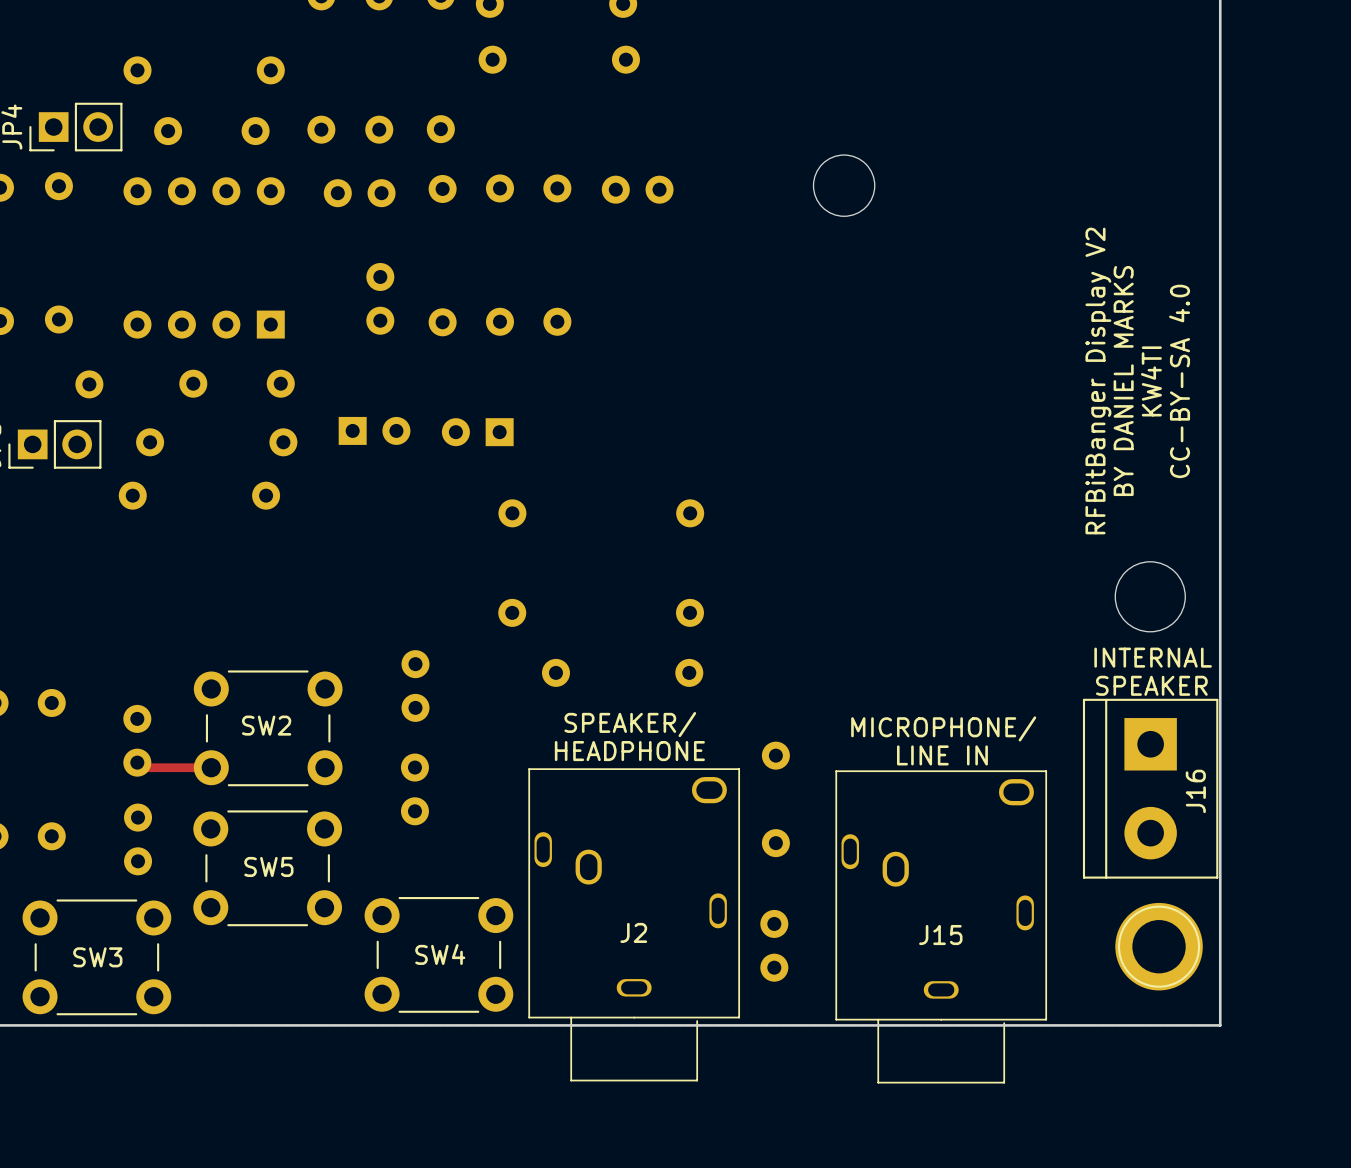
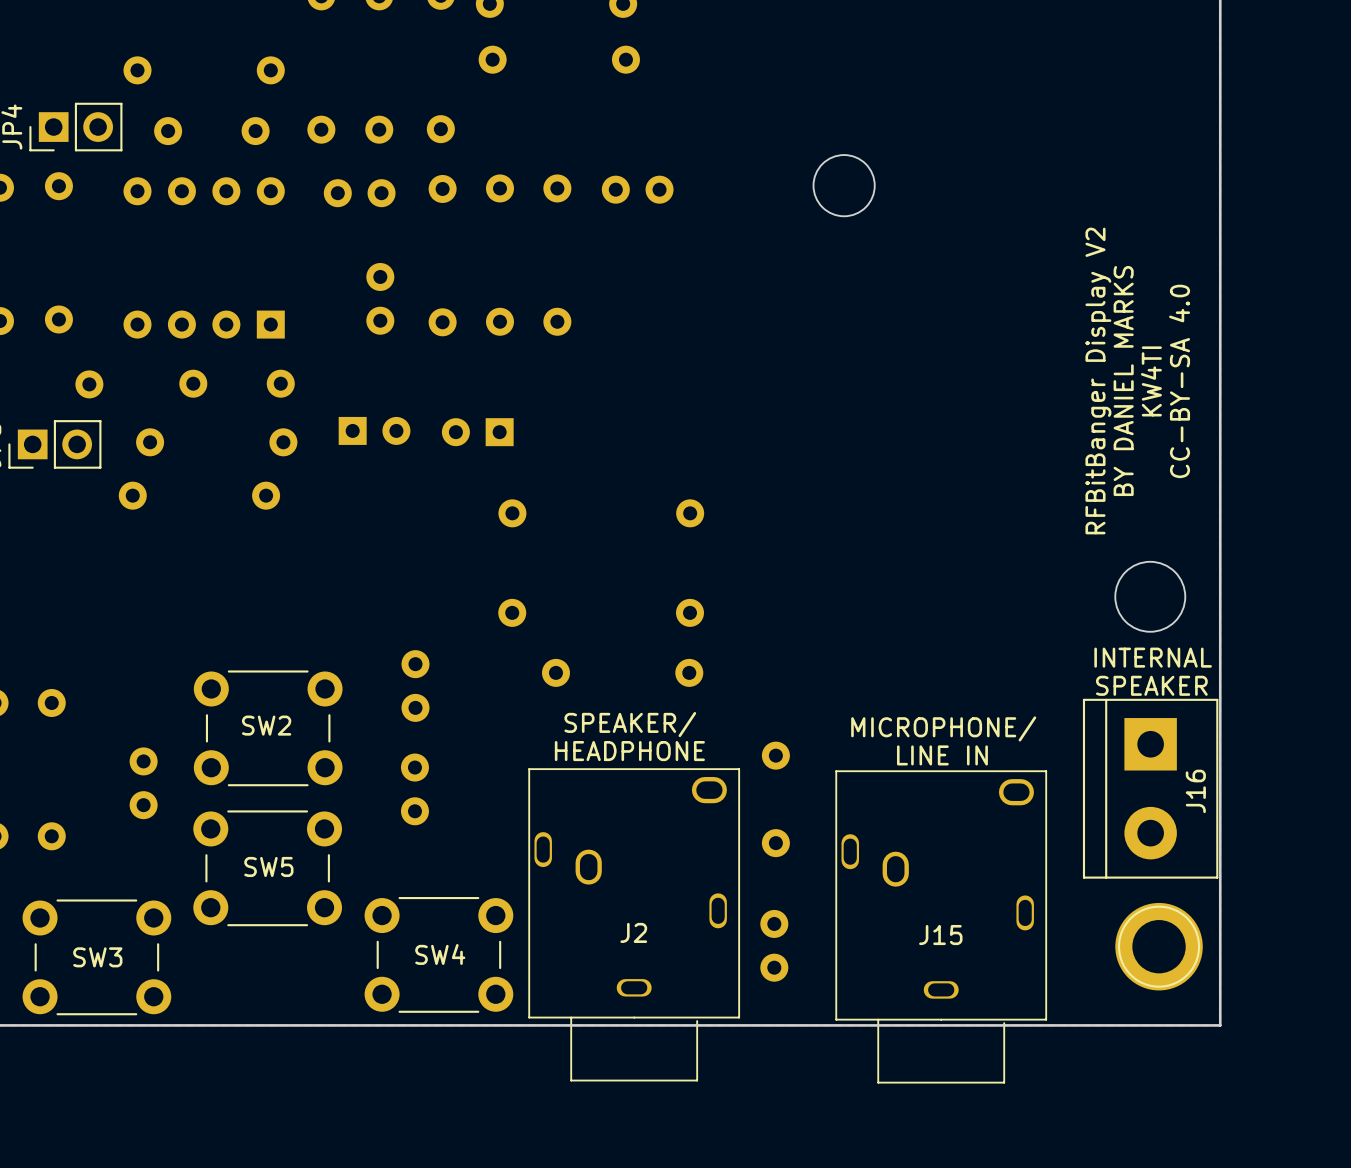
part: (137, 740) -> none
track: (137, 762) (142, 767) (211, 767) -> none
part: none -> (143, 783)
part: (138, 839) -> none

